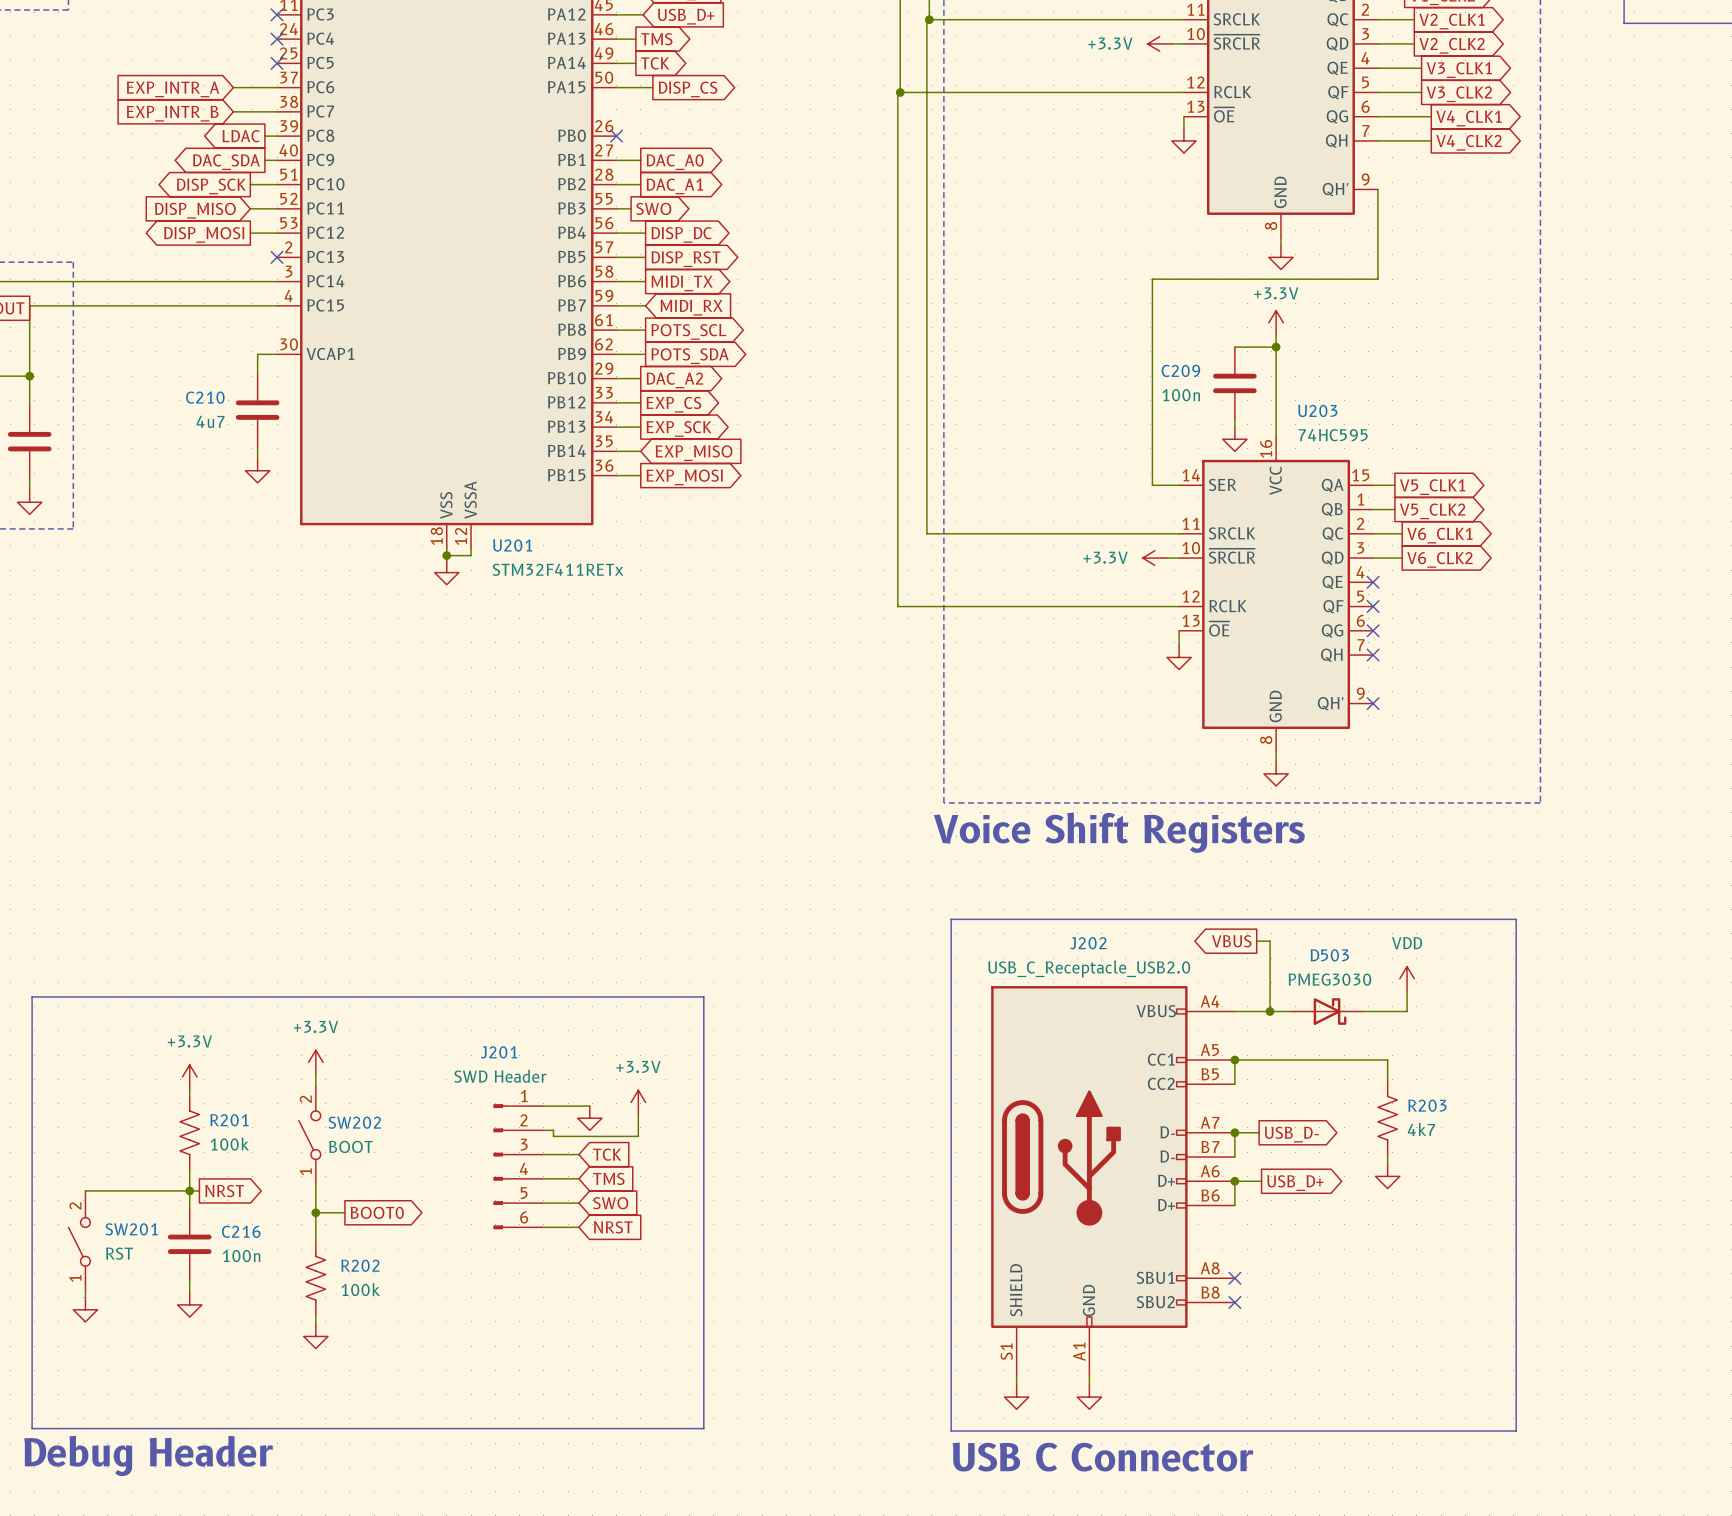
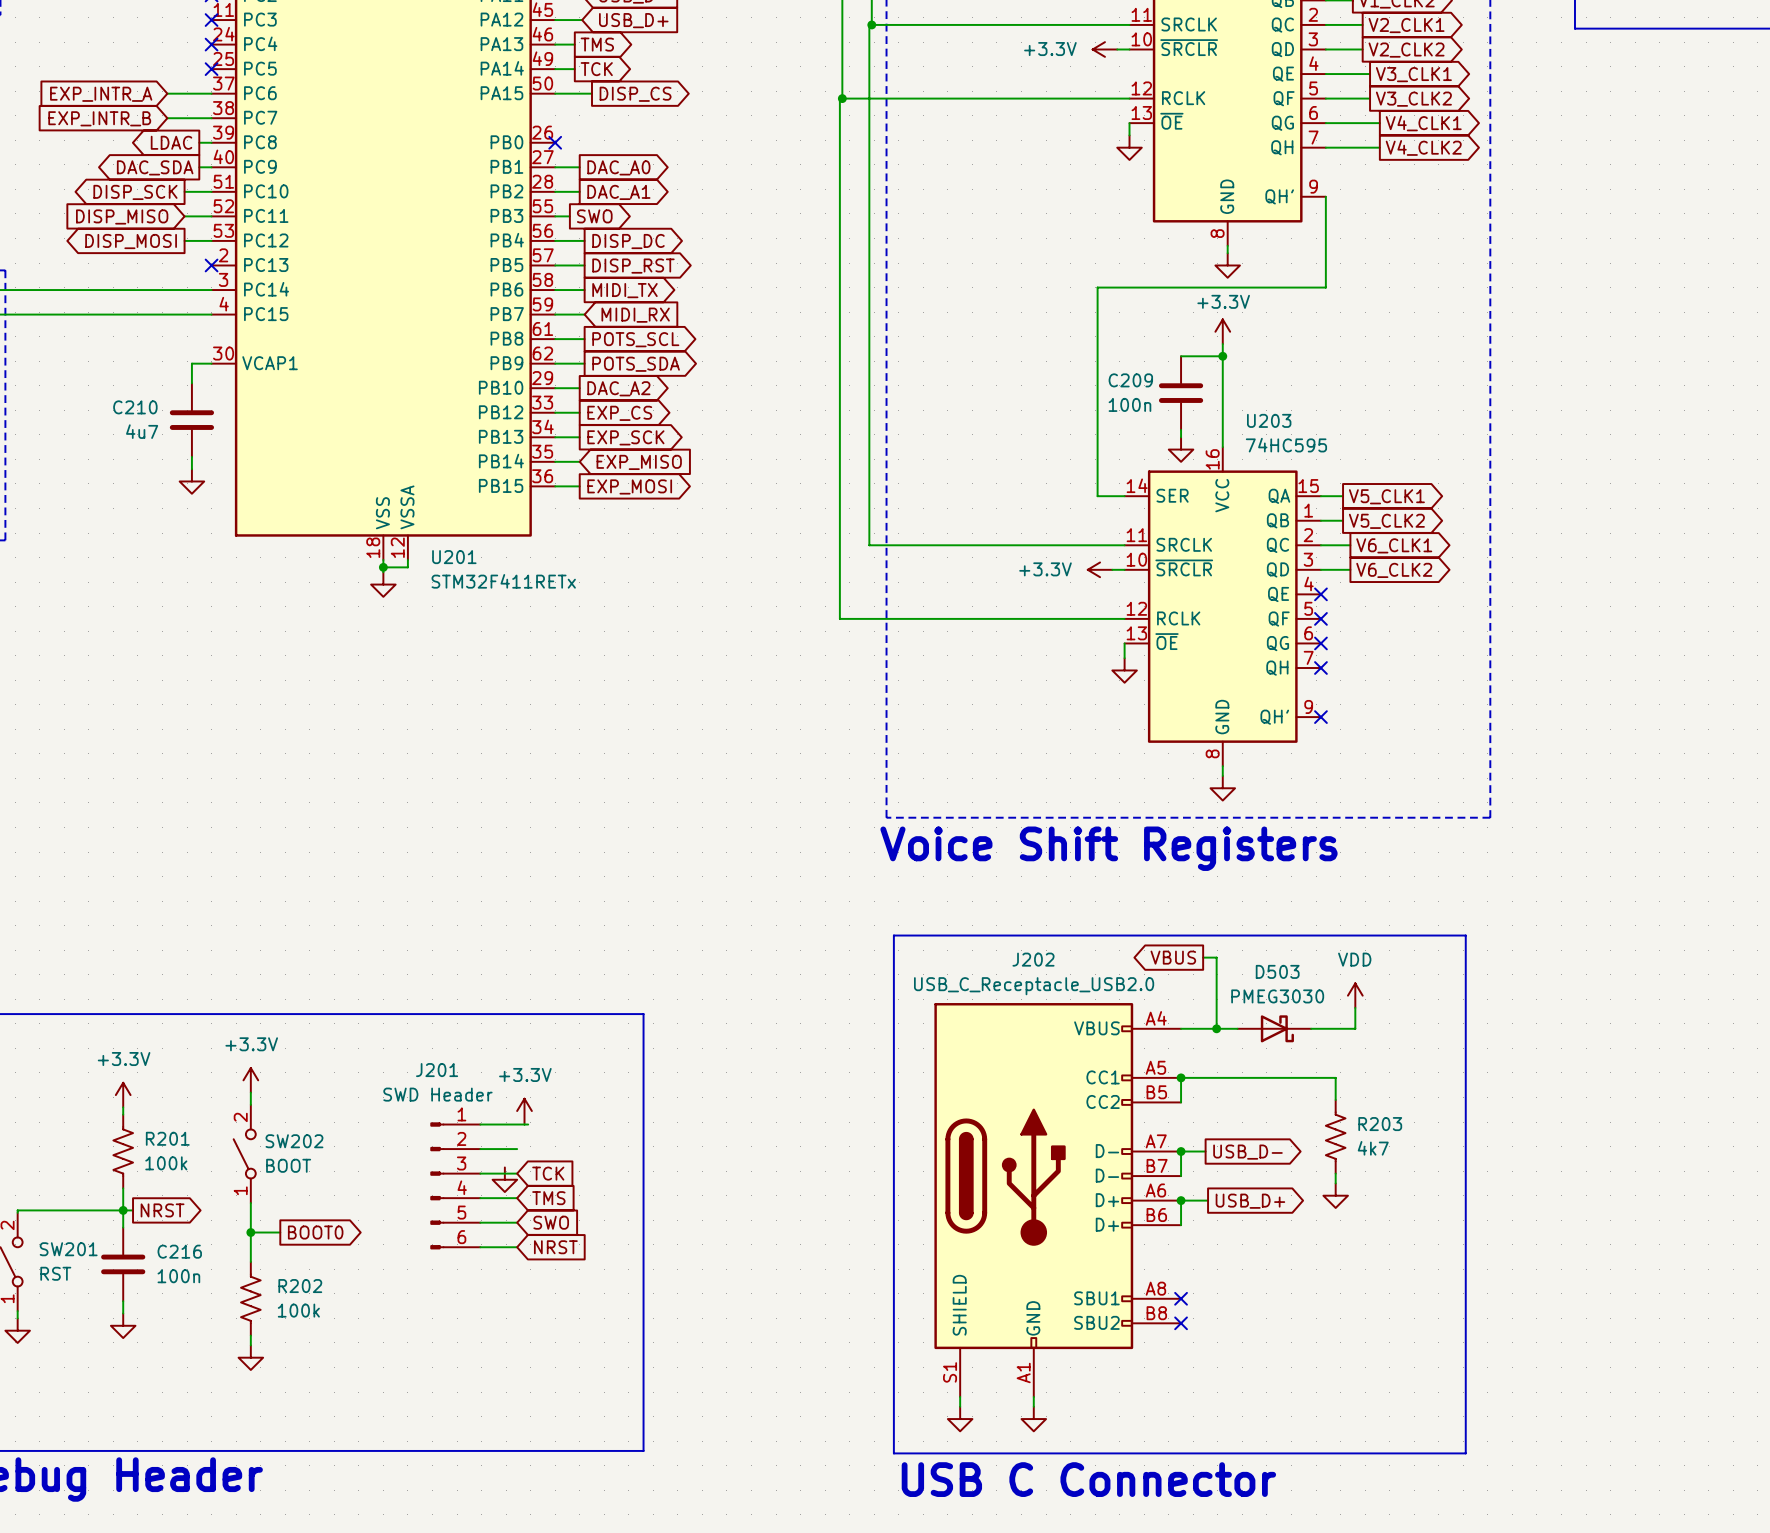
power symbol position: +3.3V (638, 1102) -> +3.3V (524, 1111)
wire: (638, 1114) (638, 1136) (553, 1136) (553, 1130) -> (517, 1149) (491, 1149)
power symbol position: (589, 1118) -> (504, 1179)

